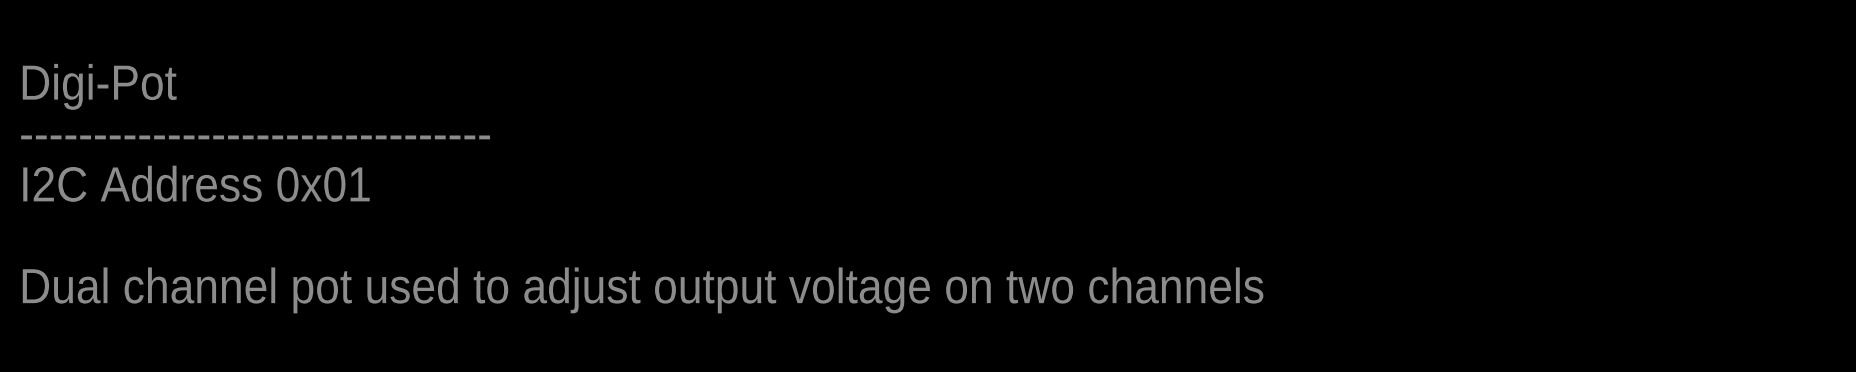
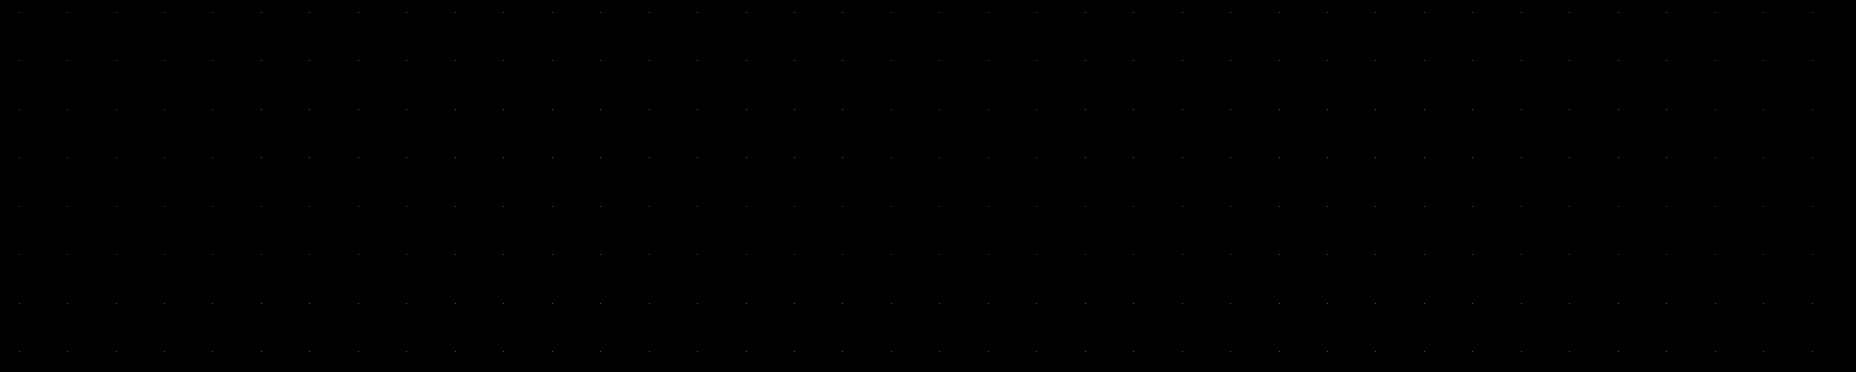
text: Digi-Pot (99, 86) -> none
text: -------------------------------- (255, 137) -> none
text: I2C Address 0x01 (196, 183) -> none
text: Dual channel pot used to adjust output voltage on two channels (643, 290) -> none

